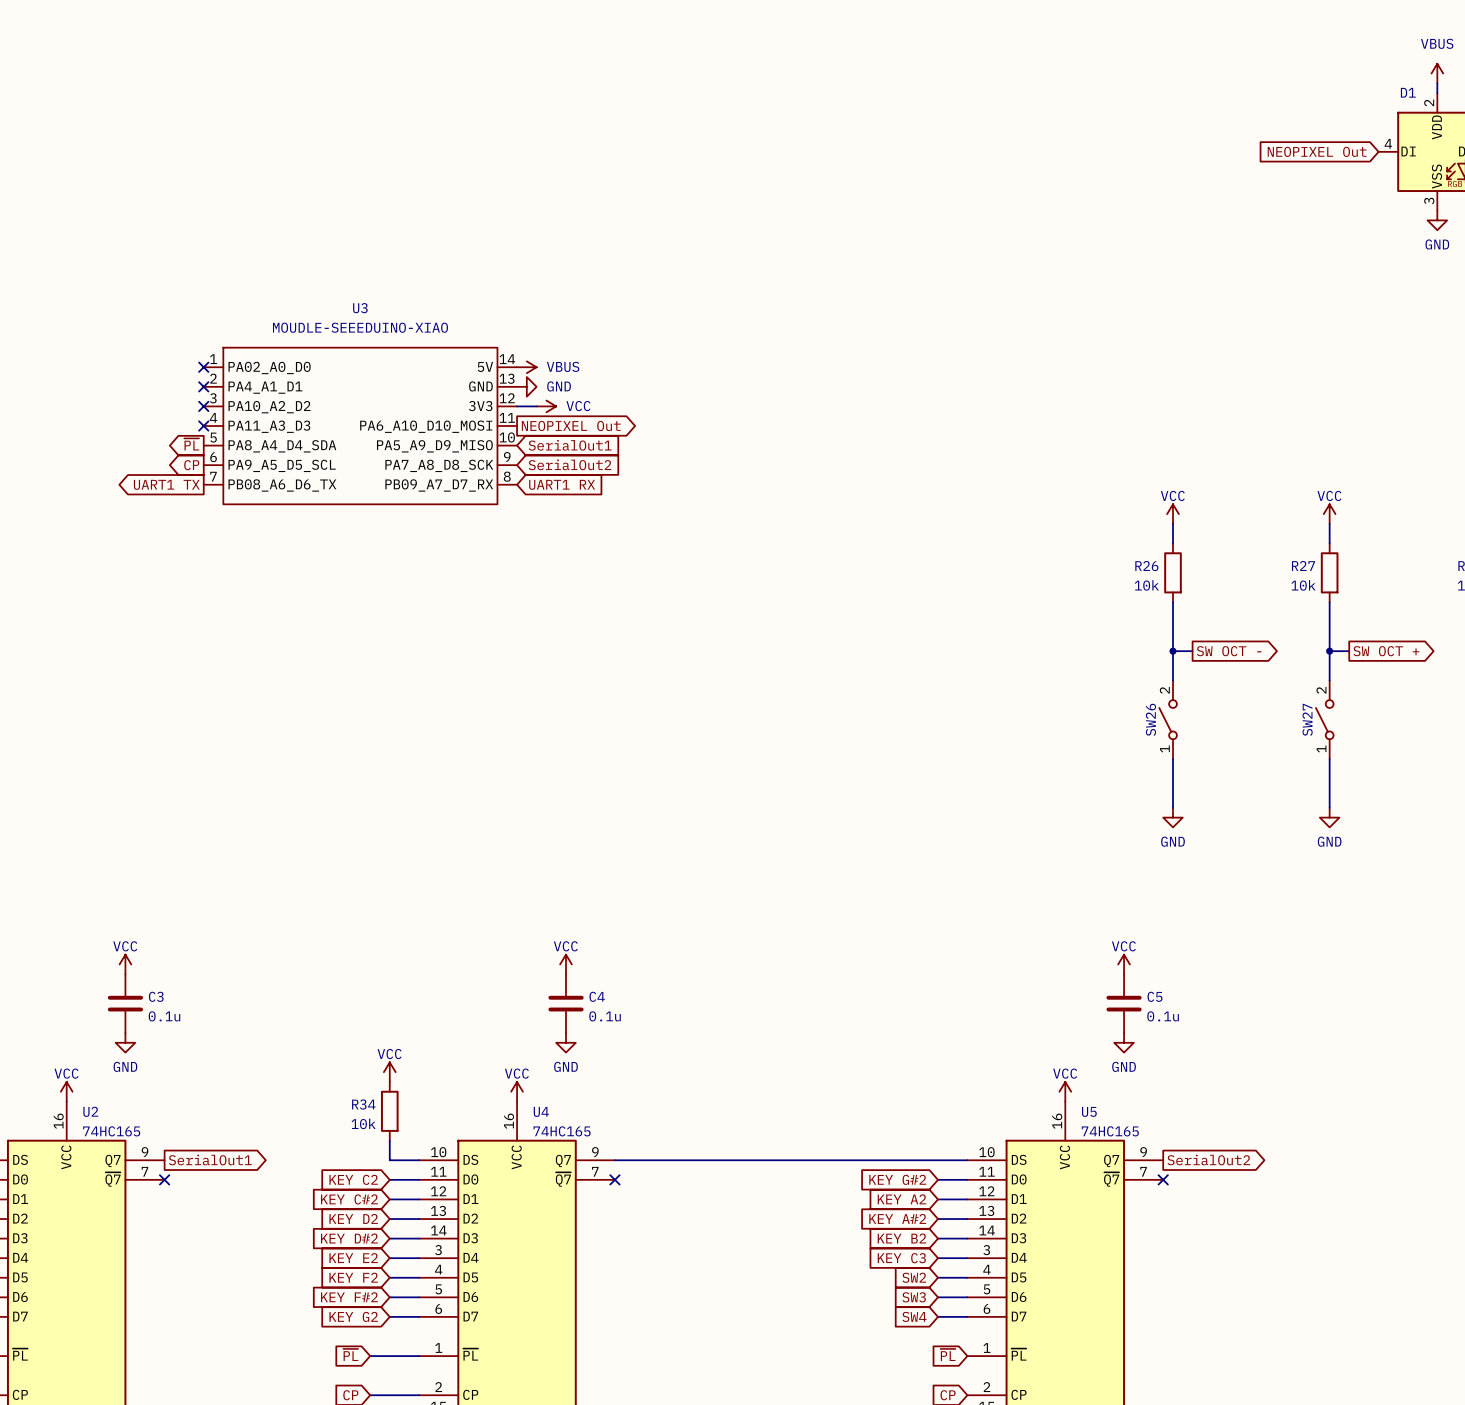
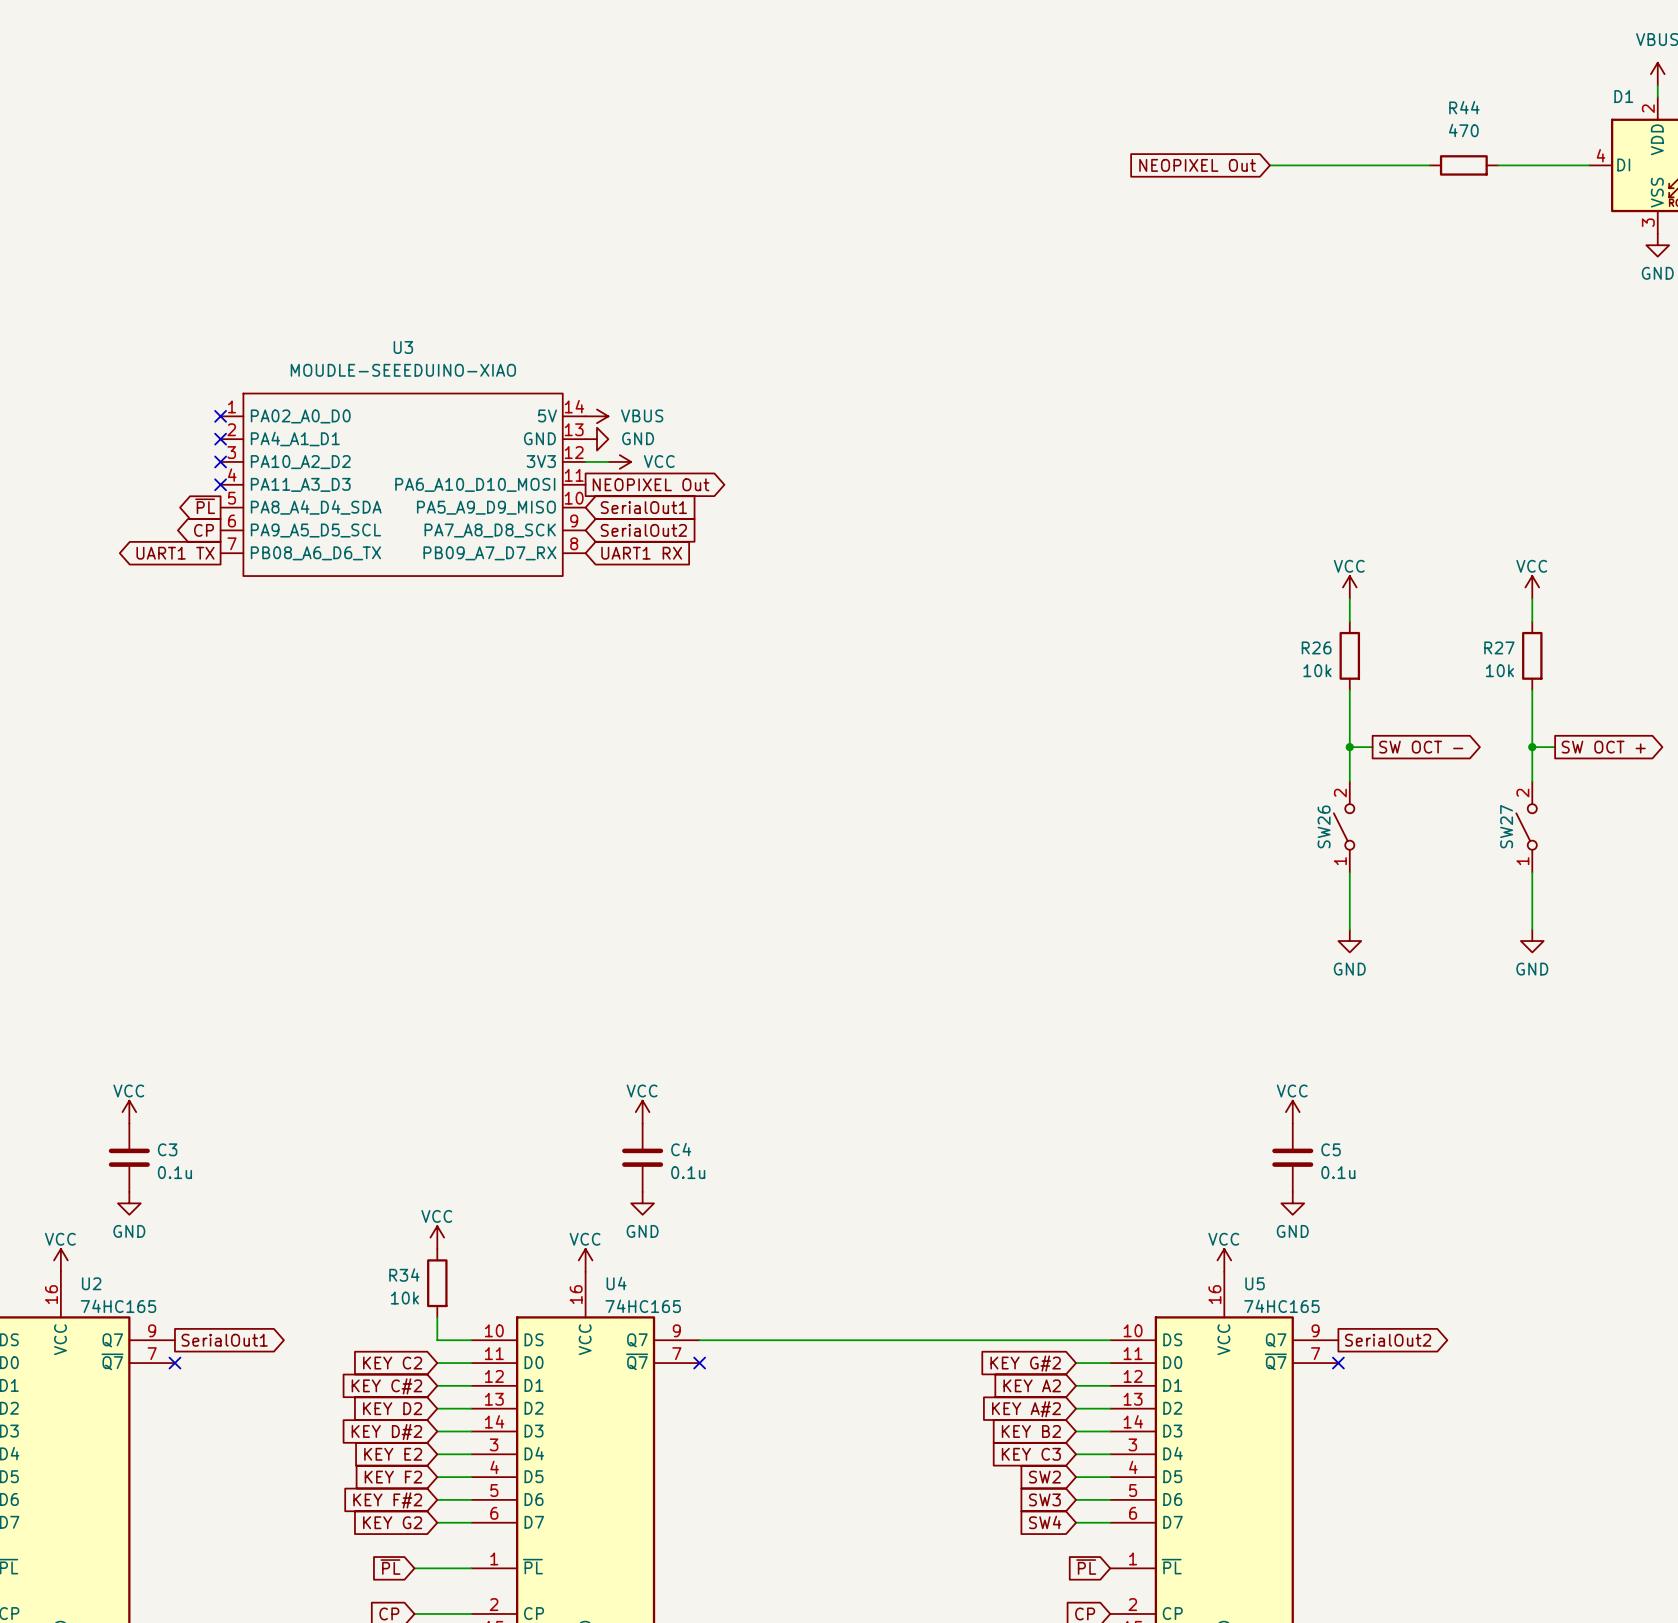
global label: none -> NEOPIXEL Out (1197, 165)
wire: none -> (1269, 165) (1429, 165)
R44: none -> 470 (1463, 165)
wire: none -> (1498, 165) (1589, 165)
global label: NEOPIXEL Out (1317, 151) -> none

